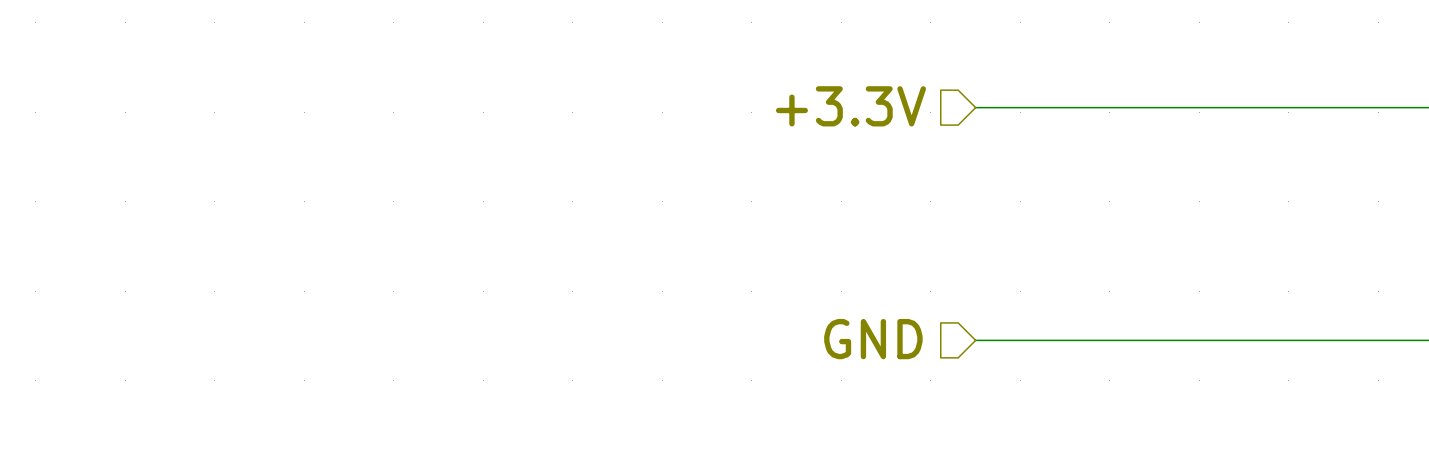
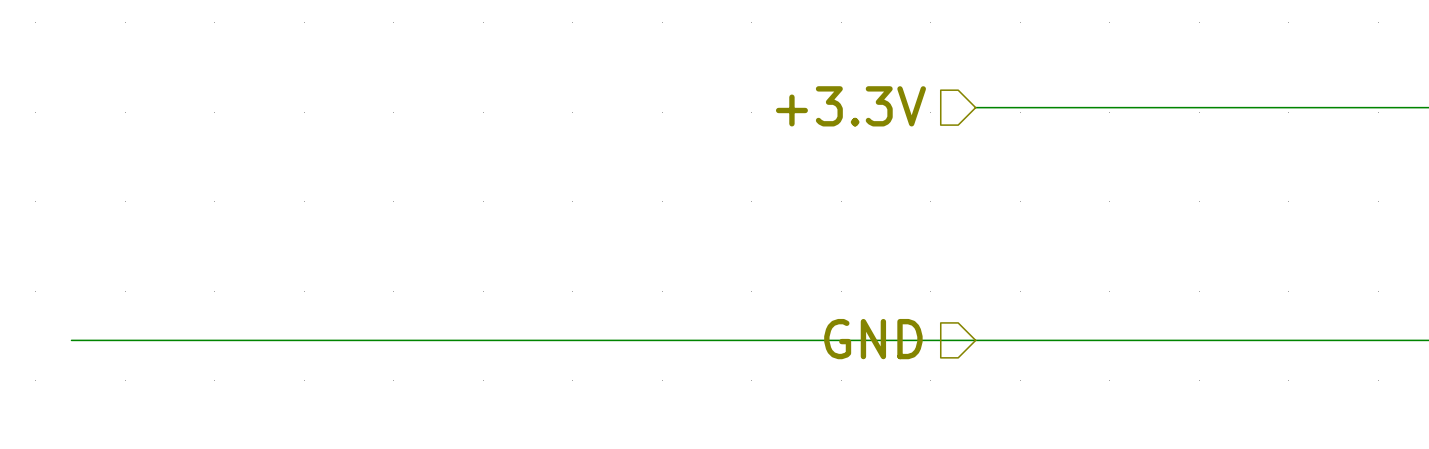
wire: none -> (71, 340) (975, 340)

